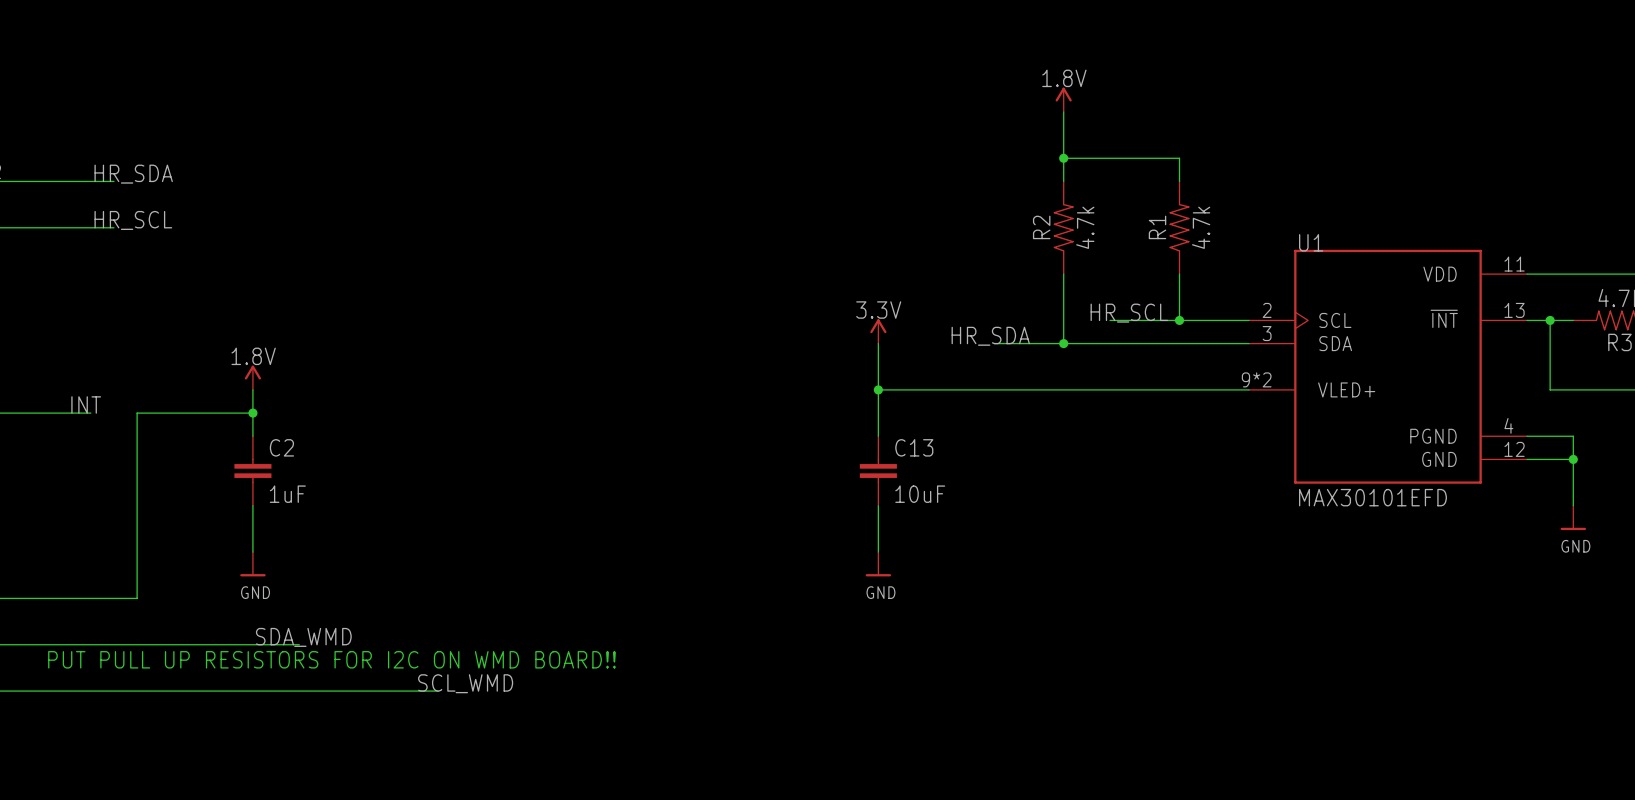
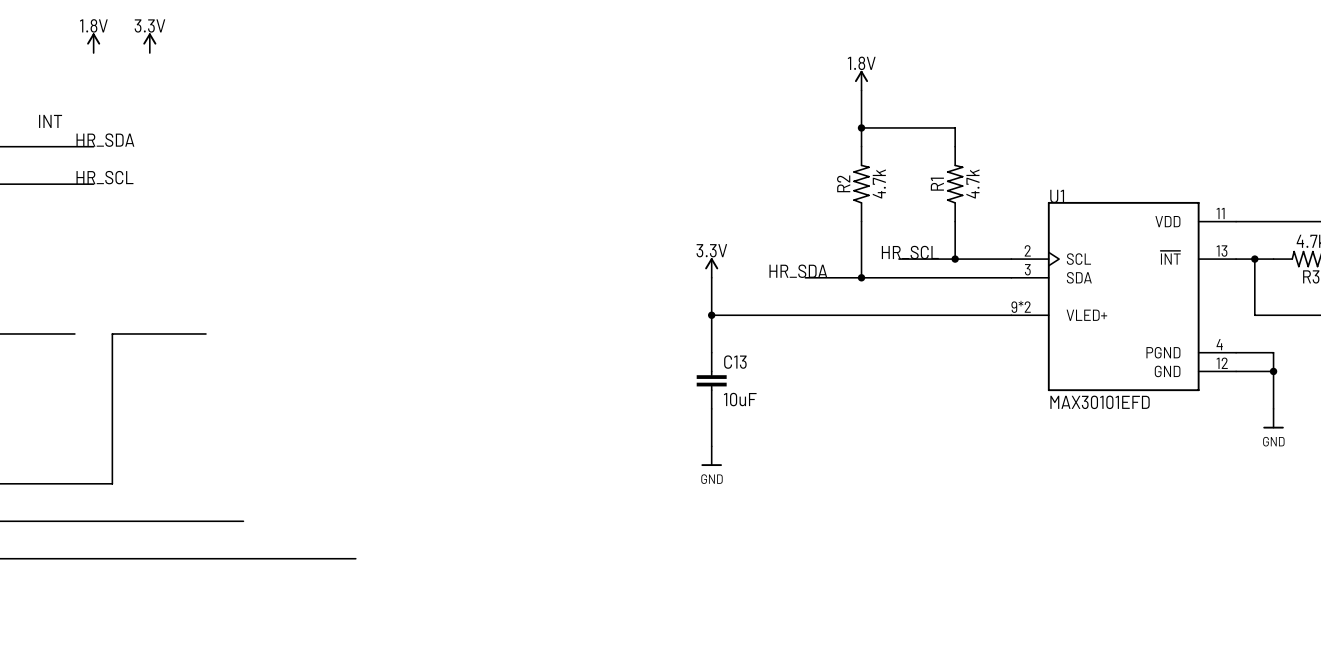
power symbol: none -> 1.8V (93, 43)
power symbol: none -> 3.3V (149, 43)
label: none -> INT (50, 121)
power symbol: 1.8V (252, 377) -> none
wire: (252, 389) (252, 436) -> none
label: INT (86, 404) -> none
junction: (252, 413) -> none
C2: 1uF (252, 471) -> none
wire: (252, 505) (252, 552) -> none
power symbol: GND (252, 564) -> none
label: SDA_WMD (303, 637) -> none
text: PUT PULL UP RESISTORS FOR I2C ON WMD BOARD!! (331, 659) -> none
label: SCL_WMD (465, 683) -> none

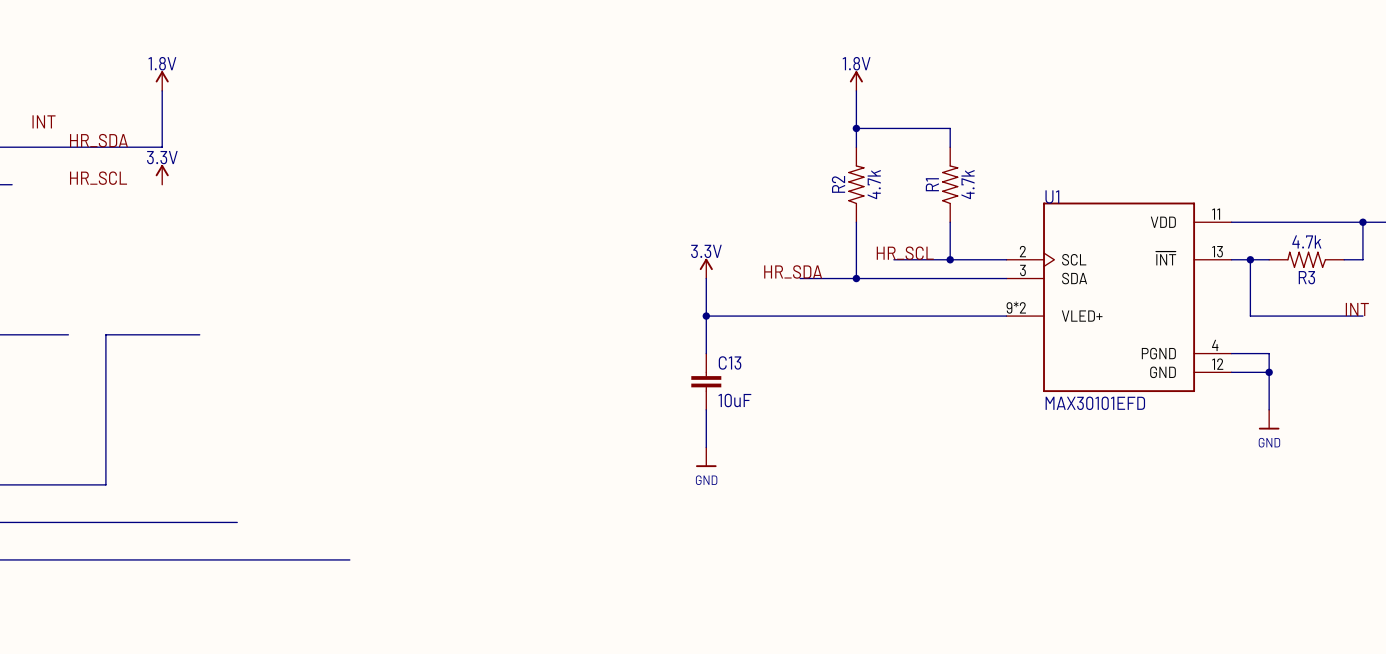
power symbol position: 1.8V (93, 43) -> 1.8V (162, 81)
power symbol position: 3.3V (149, 43) -> 3.3V (162, 174)
wire: none -> (162, 90) (162, 147) (87, 147)
wire: (18, 184) (93, 184) -> none

